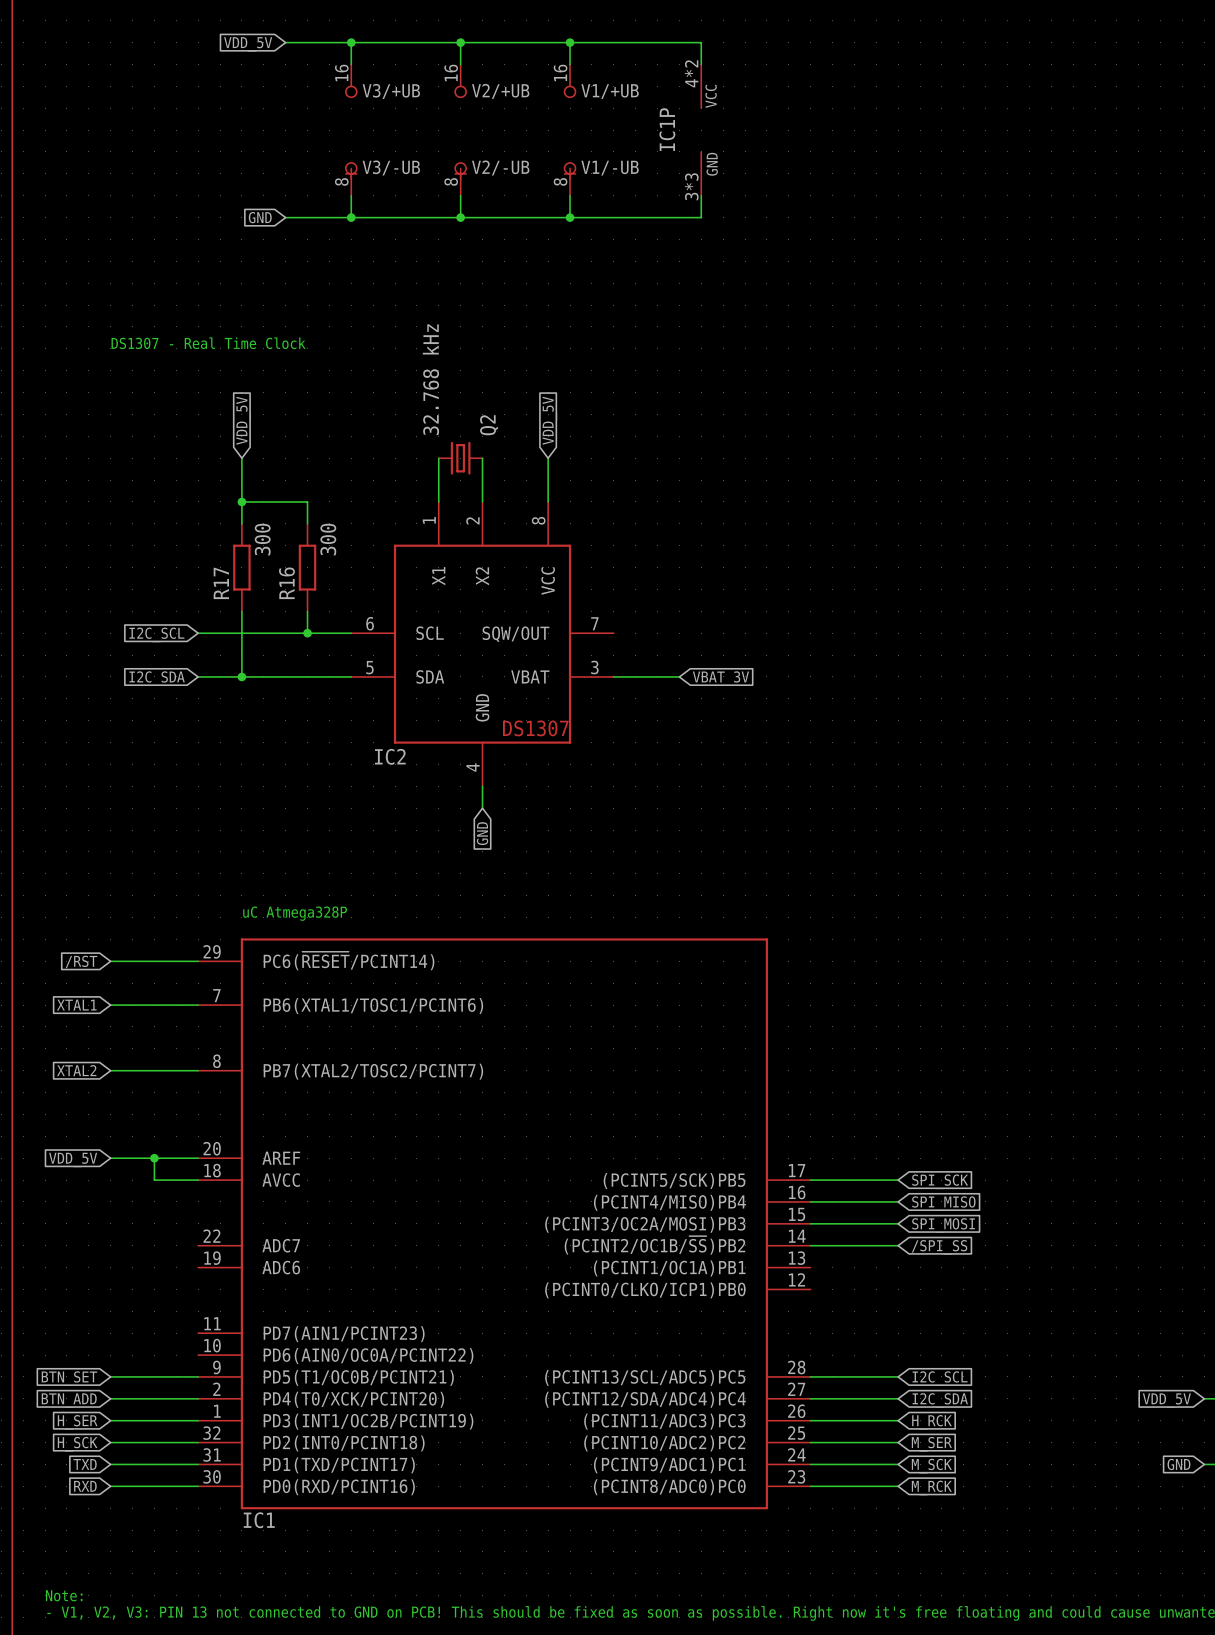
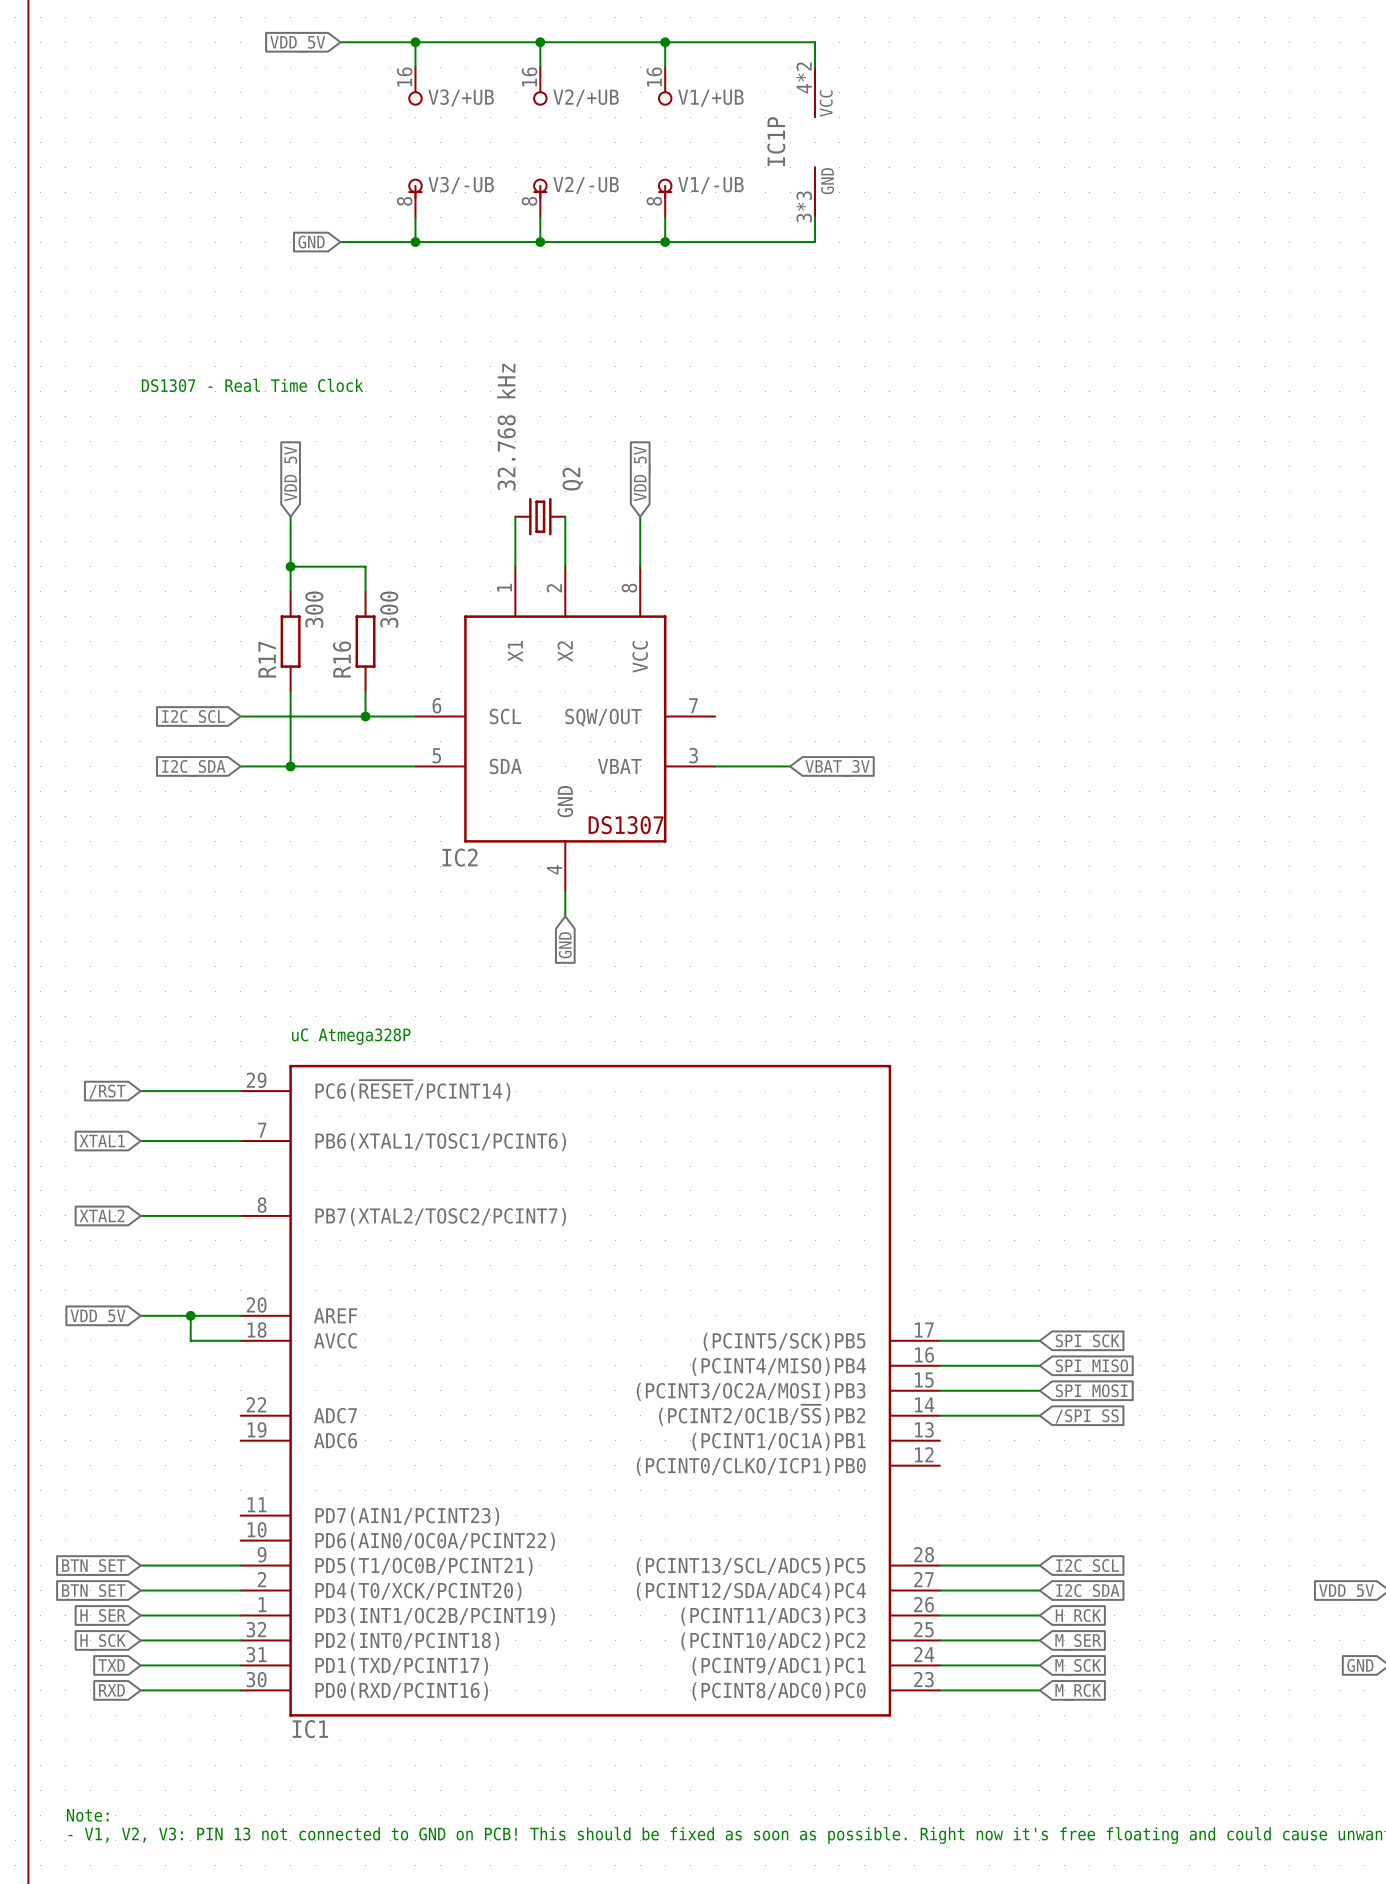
global label: BTN_ADD (69, 1400) -> BTN_SET (93, 1592)

